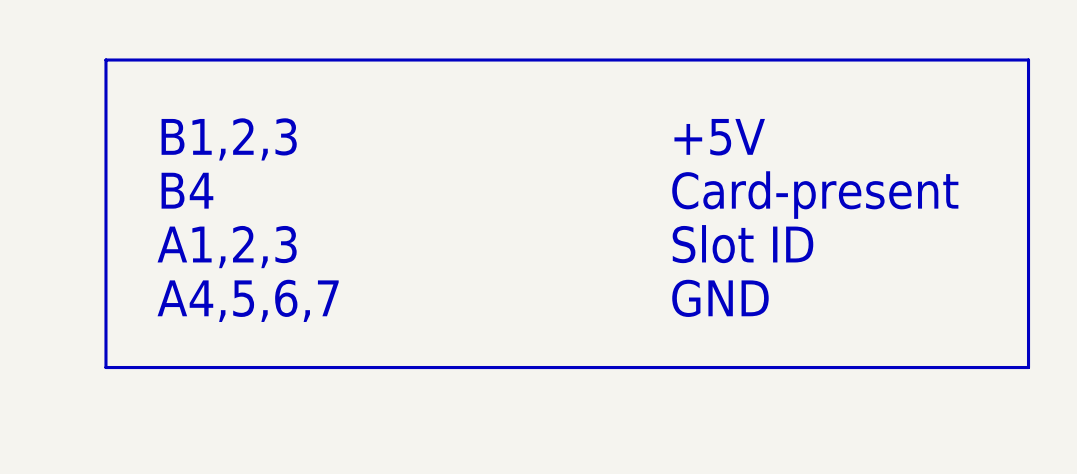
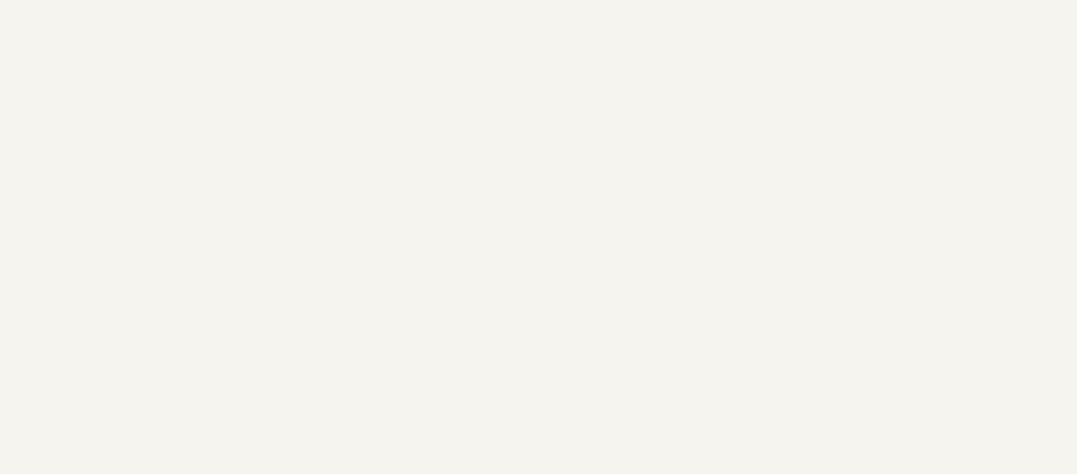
line: (105, 60) (1028, 60) (1028, 367) (105, 367) (105, 60) -> none
text: +5V (719, 137) -> none
text: B1,2,3 (229, 139) -> none
text: B4 (187, 190) -> none
text: Card-present (815, 195) -> none
text: Slot ID (742, 244) -> none
text: A1,2,3 (227, 247) -> none
text: GND (720, 298) -> none
text: A4,5,6,7 (248, 300) -> none

